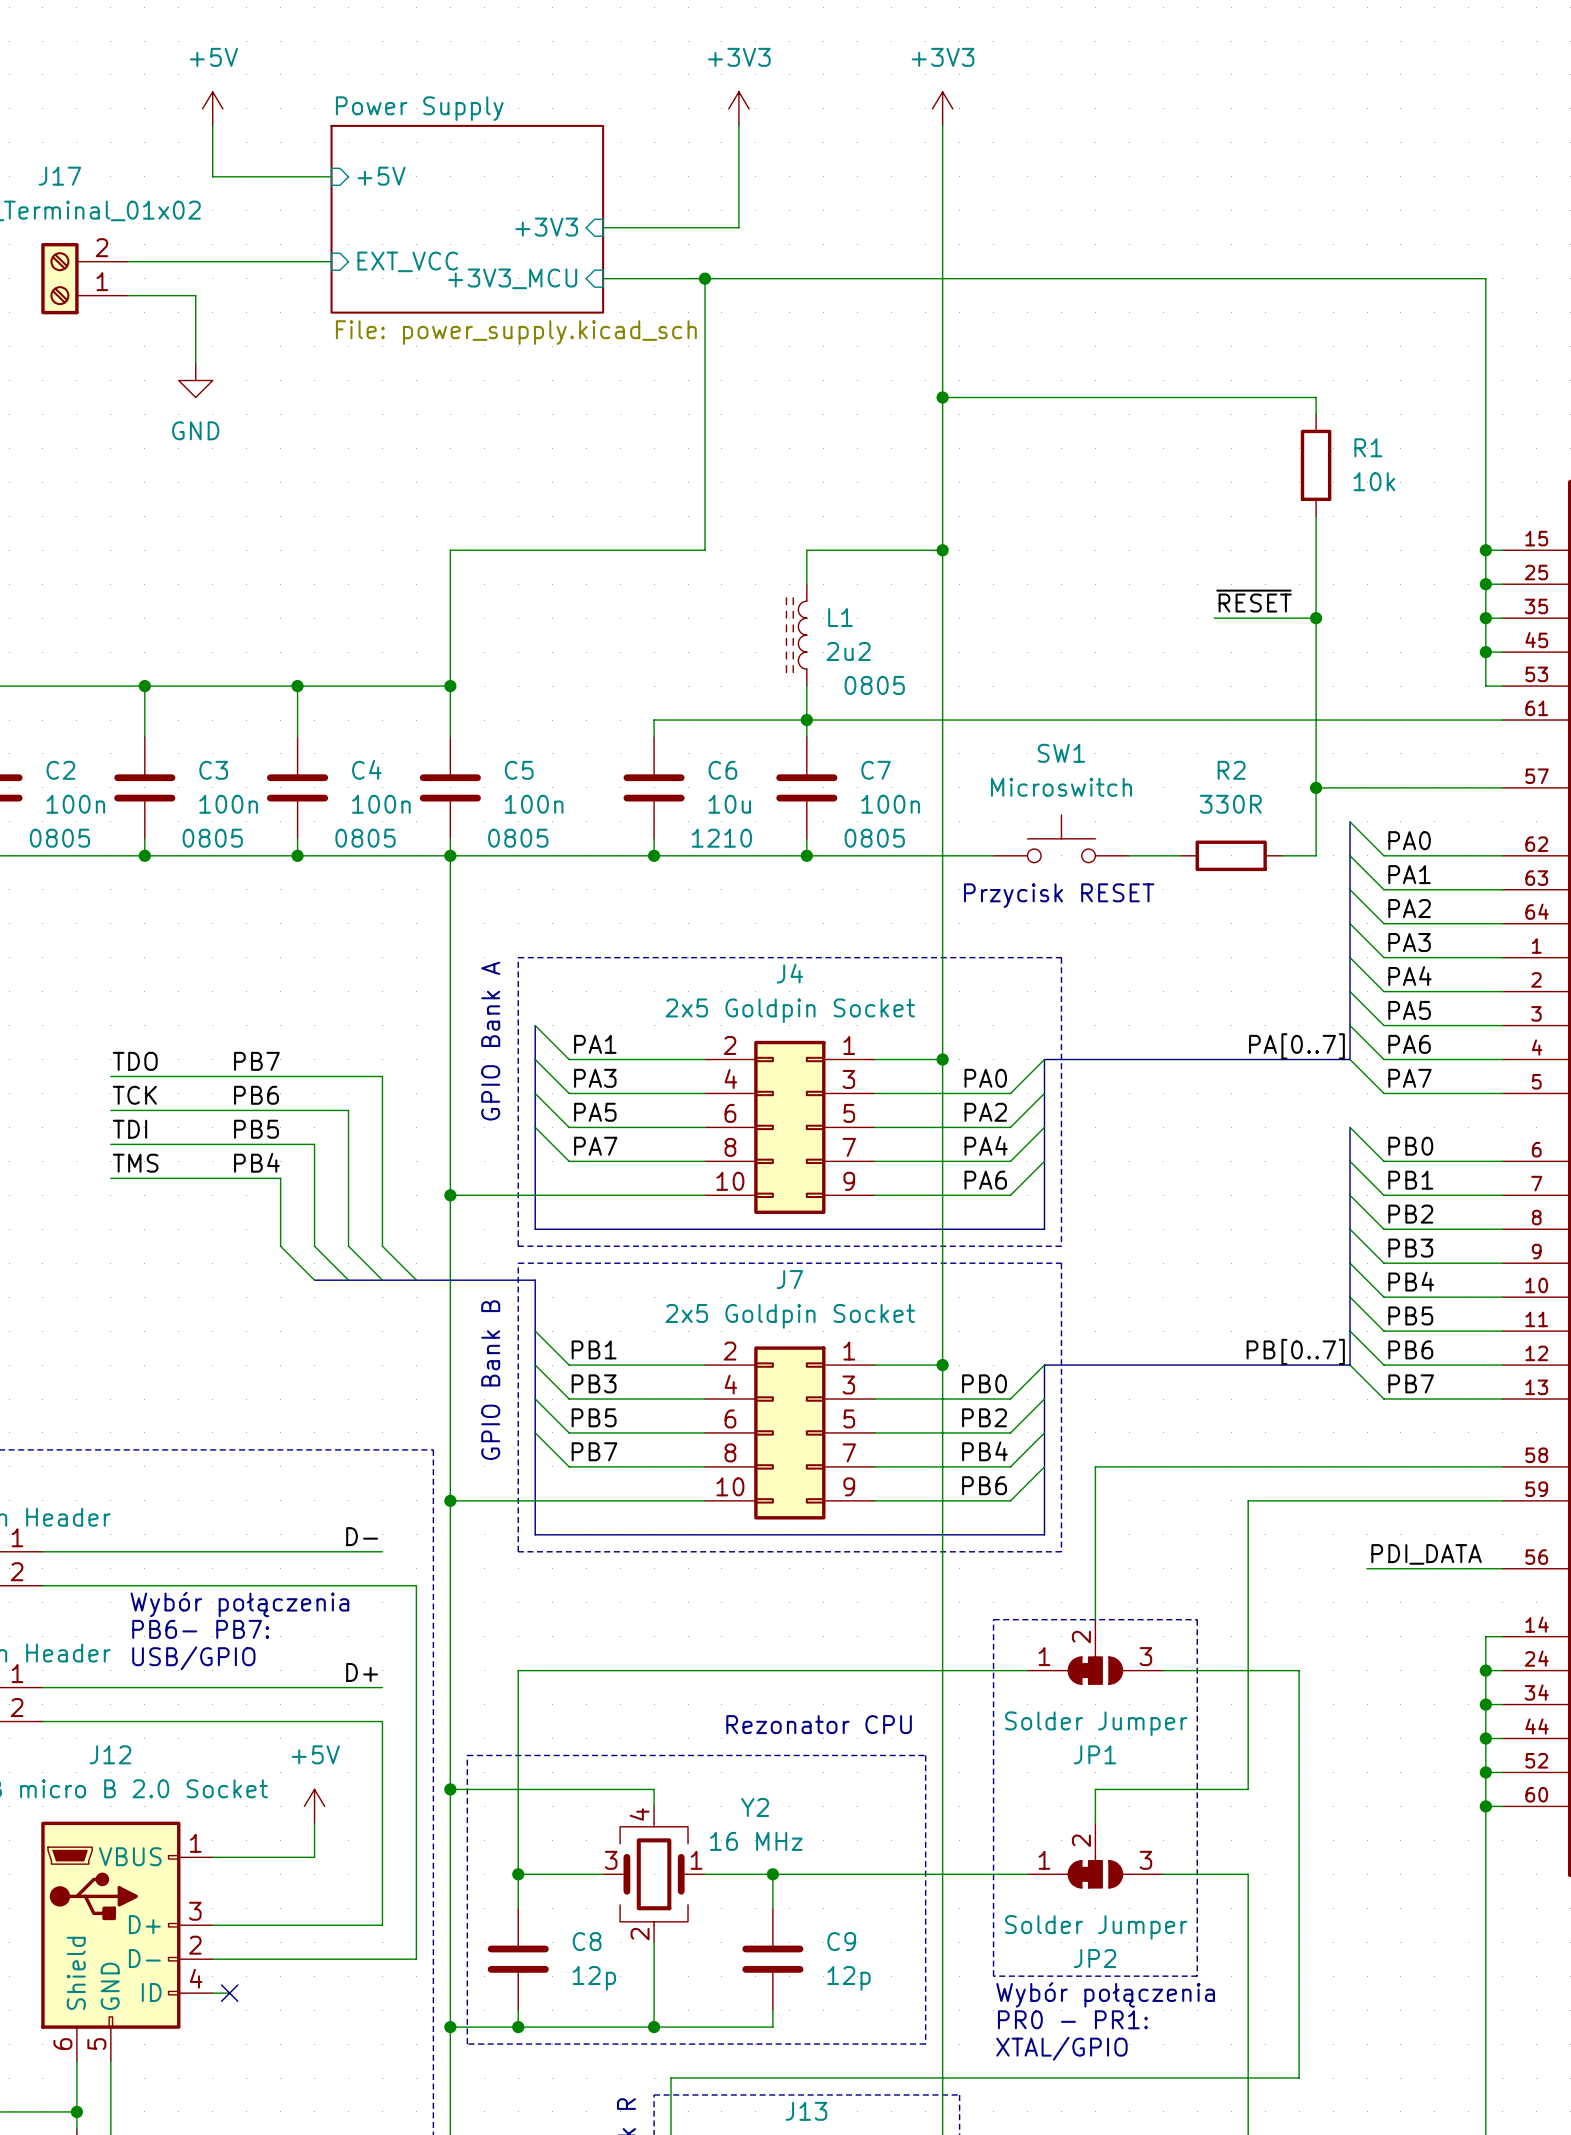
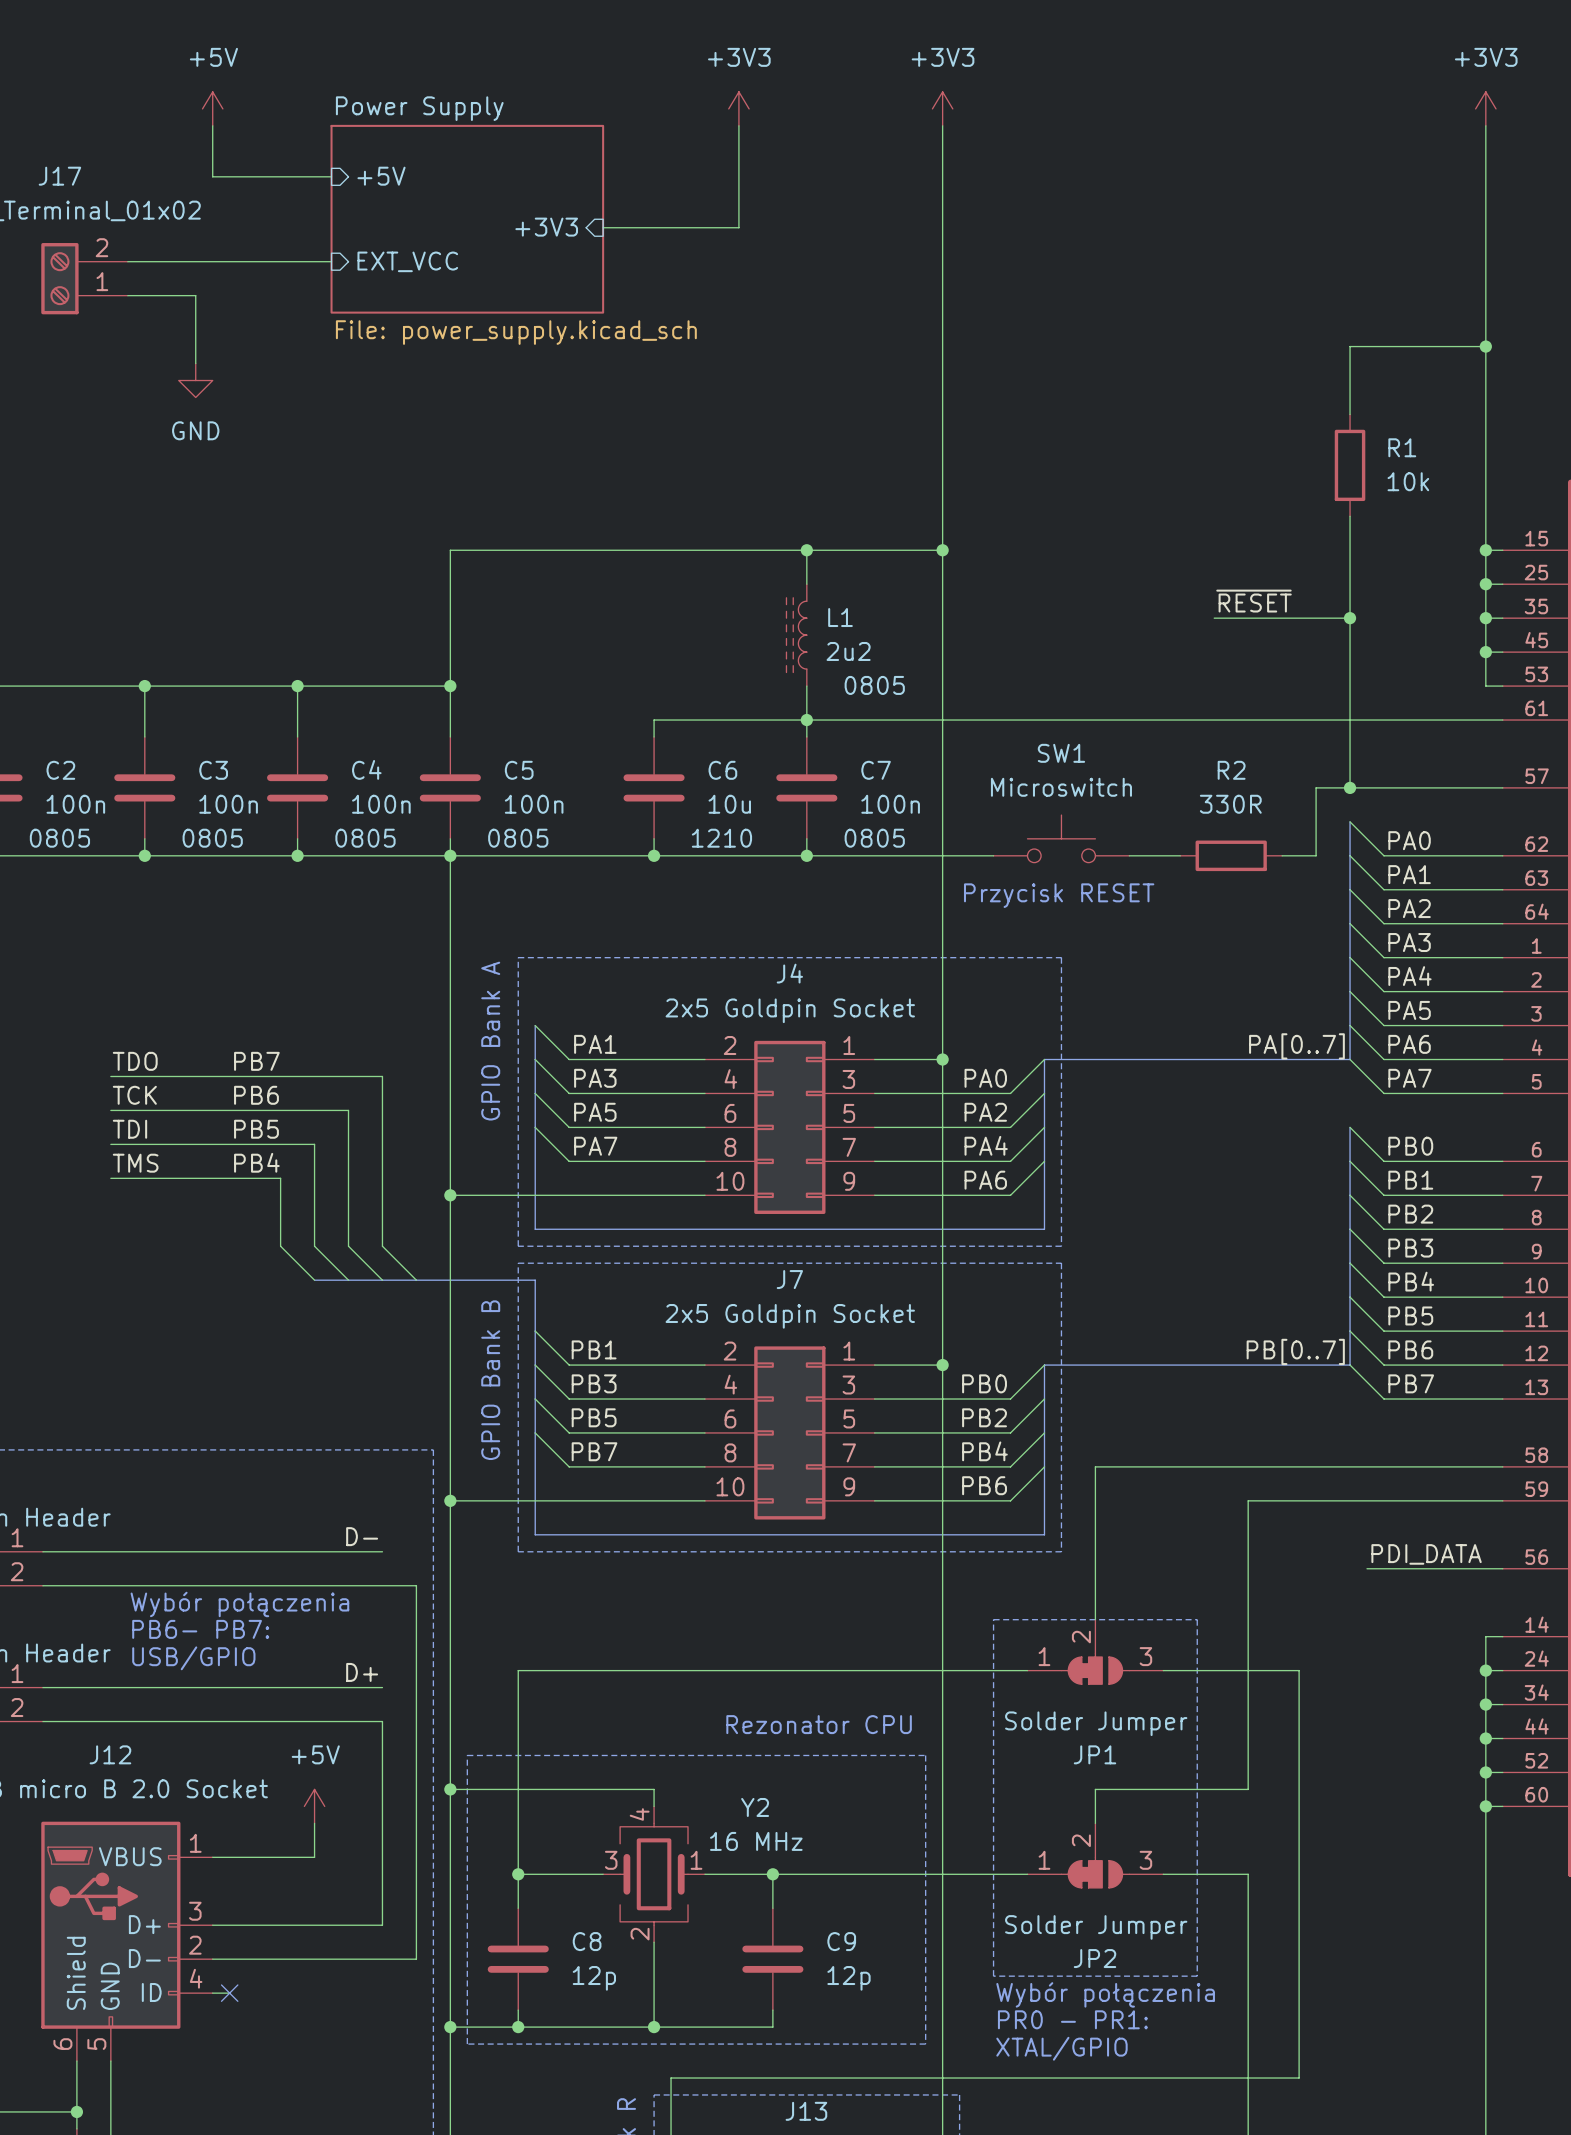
power symbol: none -> +3V3 (1485, 108)
sheet pin: +3V3_MCU (512, 278) -> none
wire: (603, 278) (1485, 278) -> (1485, 125) (1485, 278)
wire: (704, 278) (704, 550) -> (806, 550) (704, 550)
junction: (704, 278) -> none
wire: none -> (1485, 346) (1350, 346) (1350, 414)
junction: none -> (1485, 346)
wire: (942, 397) (1316, 397) (1316, 414) -> none
junction: (942, 397) -> none
R1 position: (1316, 465) -> (1350, 465)
wire: (1316, 516) (1316, 787) -> (1350, 516) (1350, 787)
junction: none -> (806, 550)
wire: none -> (1316, 618) (1350, 618)
junction position: (1316, 618) -> (1350, 618)
junction position: (1316, 787) -> (1350, 787)

